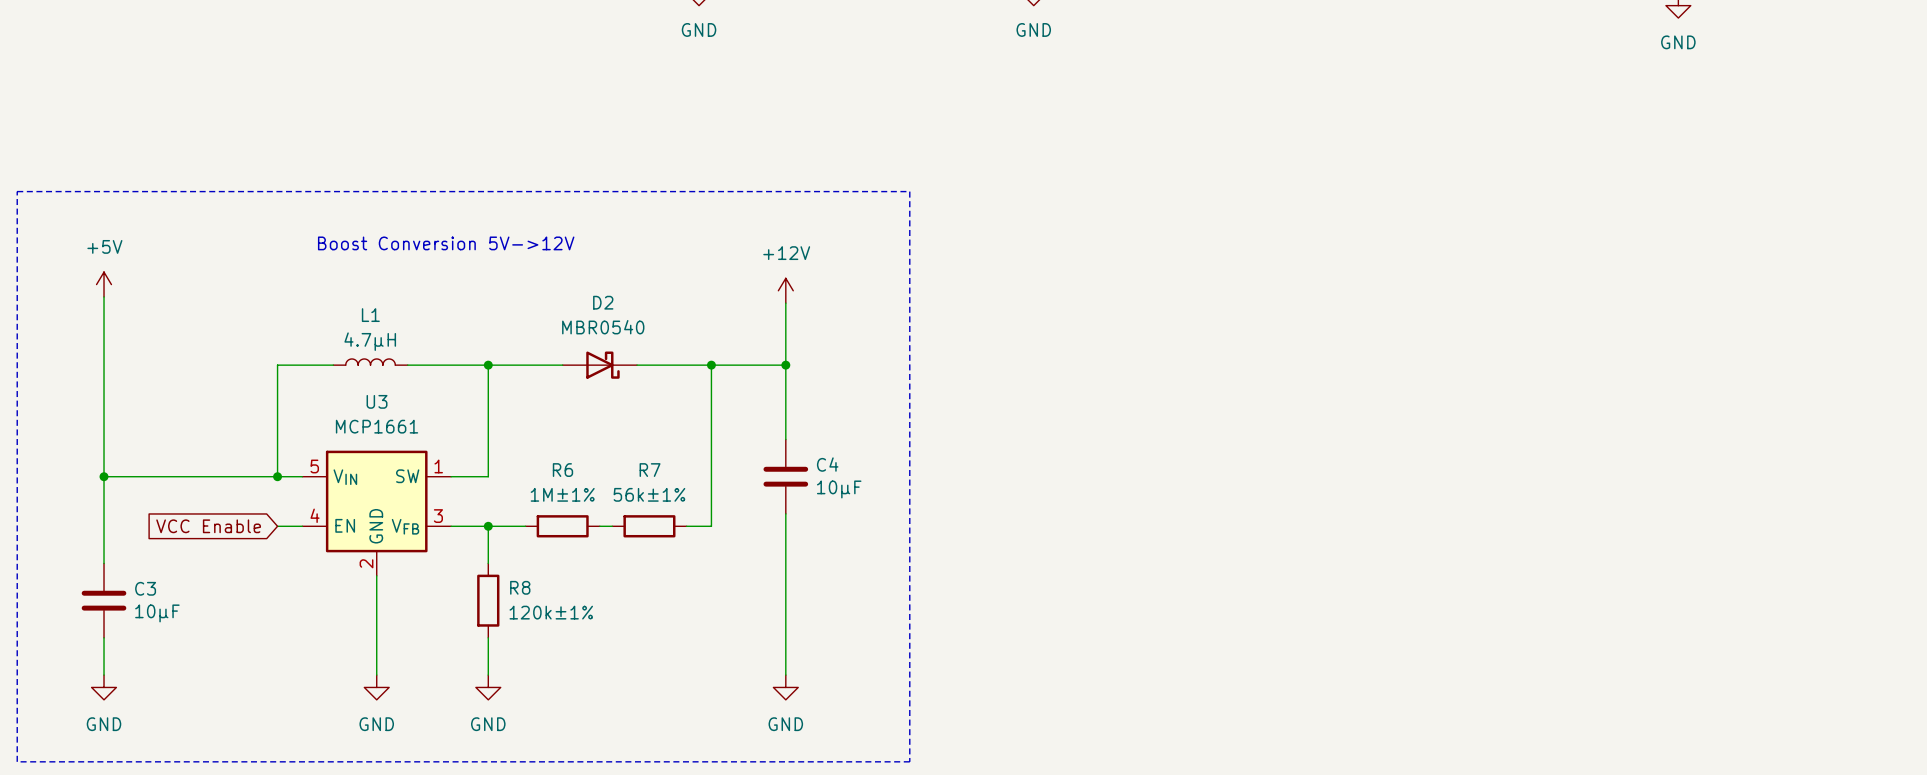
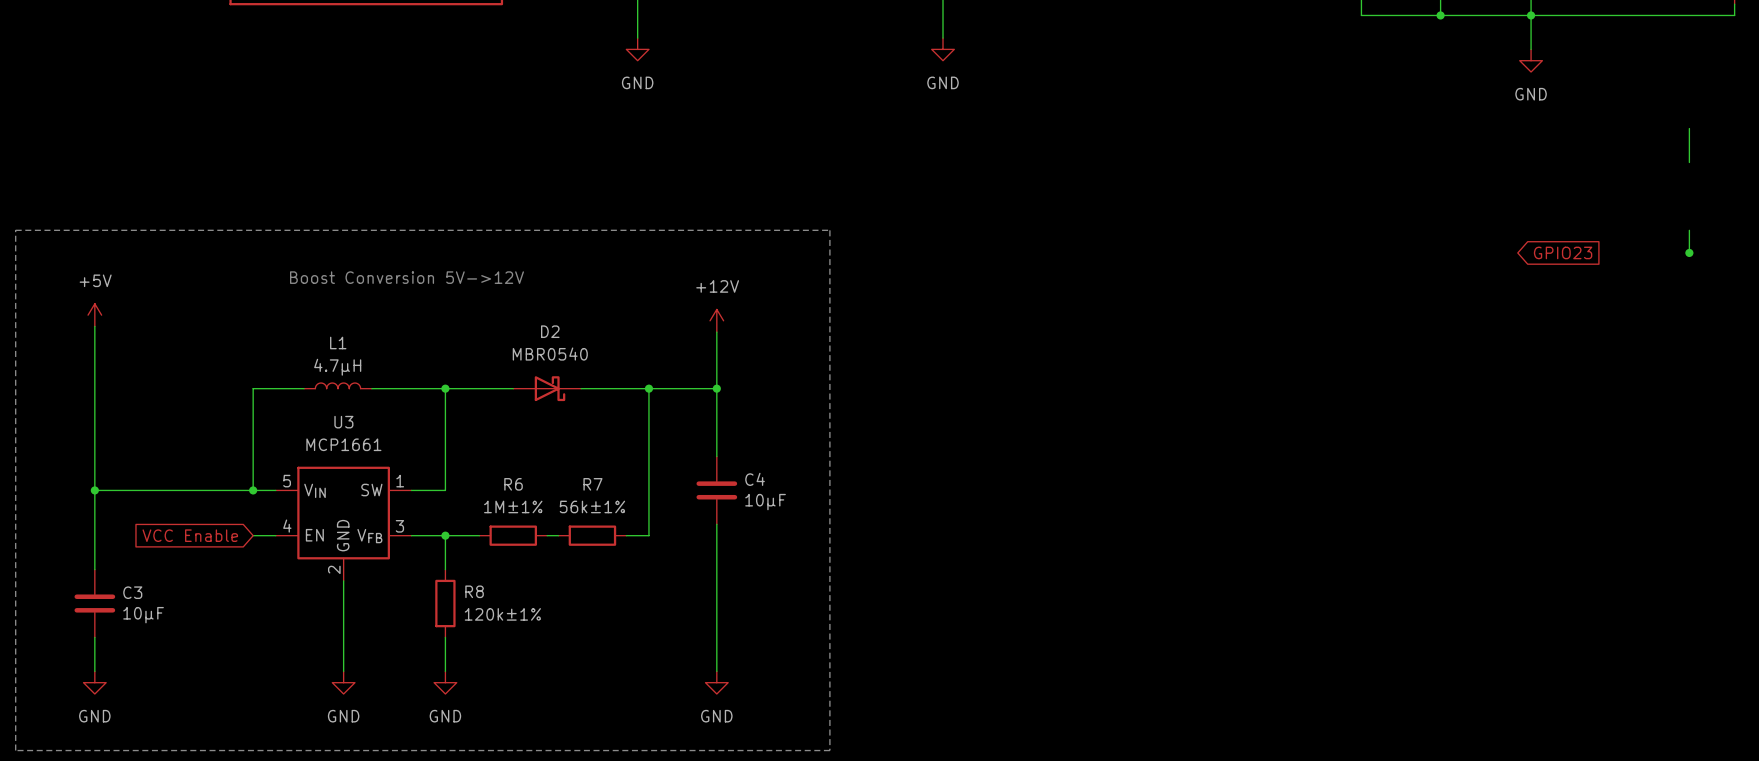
wire: none -> (1689, 128) (1689, 162)
wire: none -> (1689, 230) (1689, 252)
global label: none -> GPIO23 (1563, 252)
junction: none -> (1689, 252)

